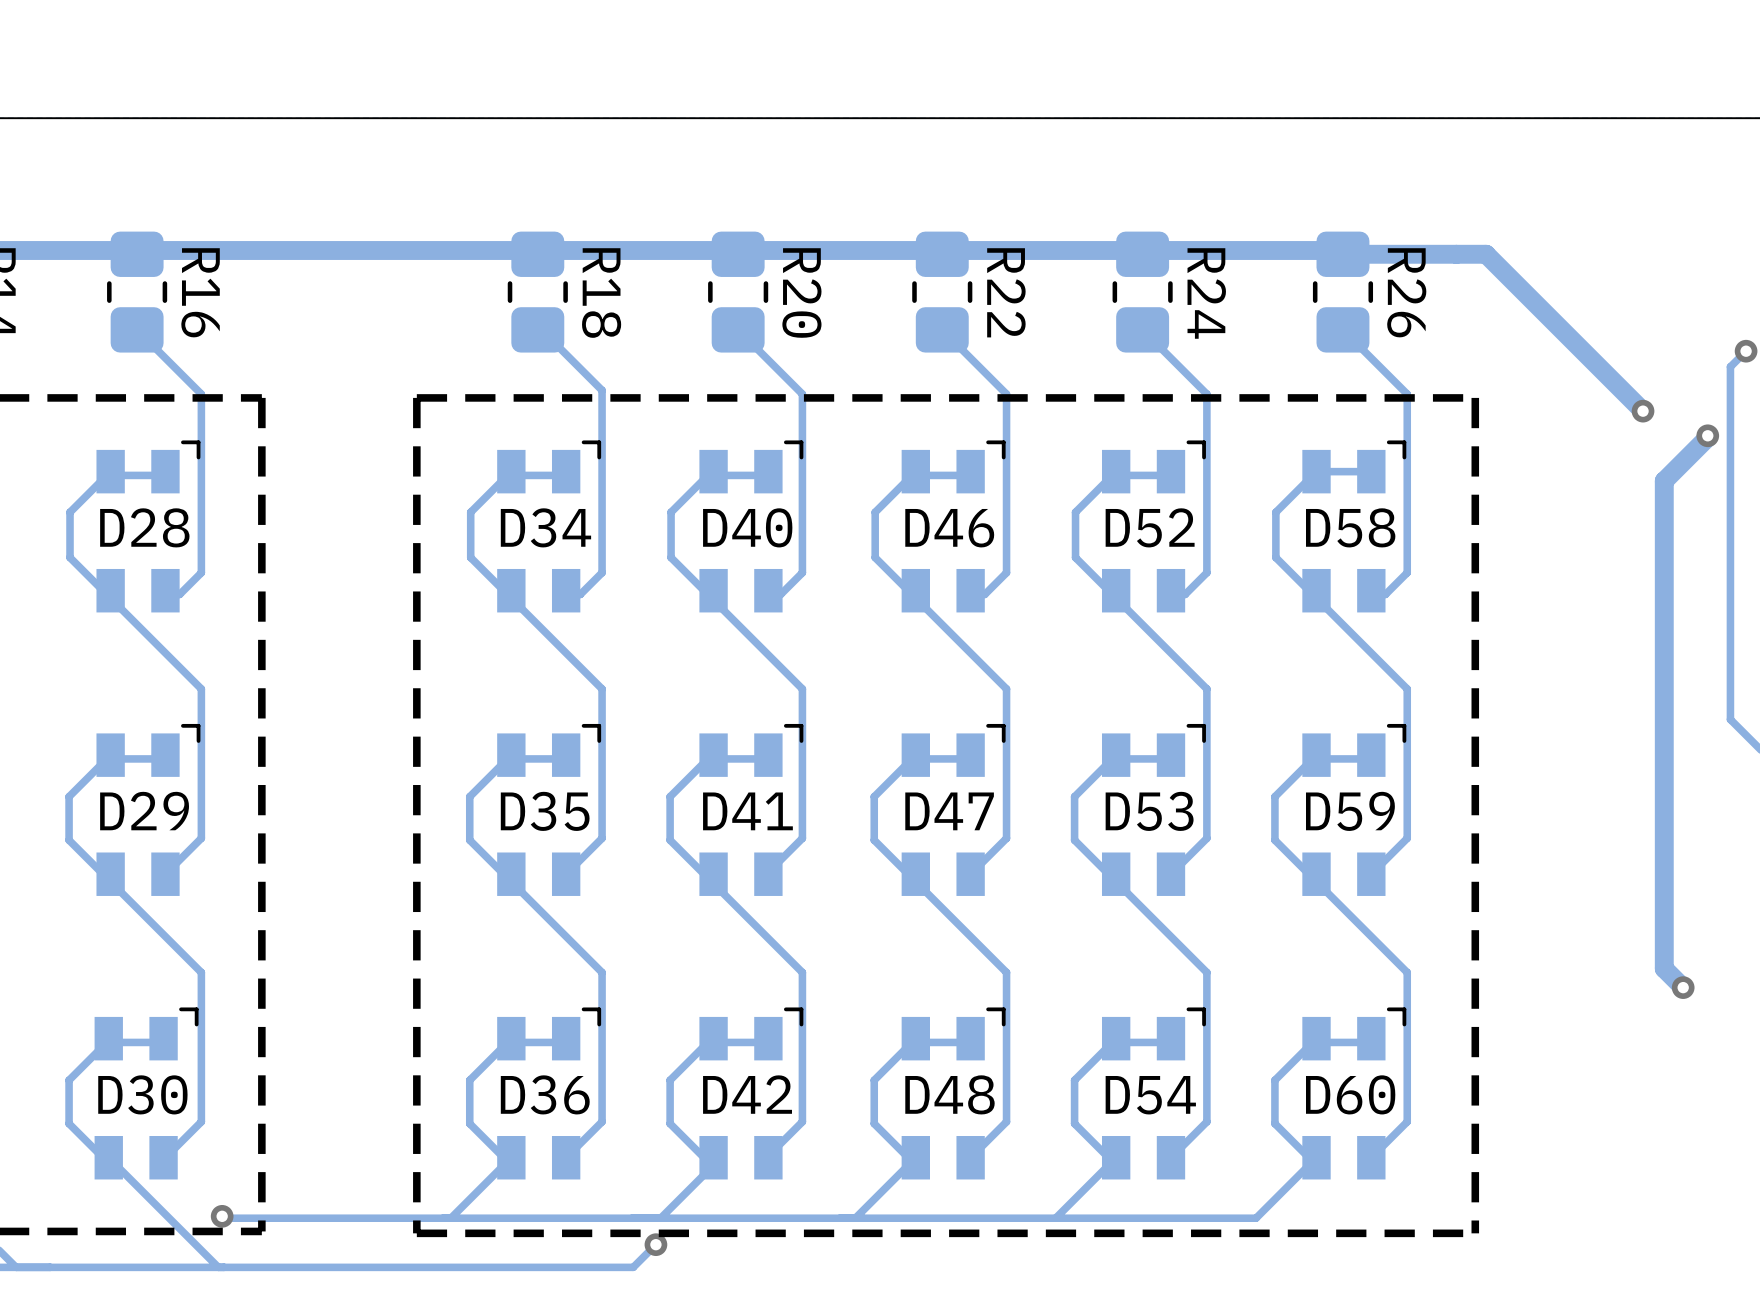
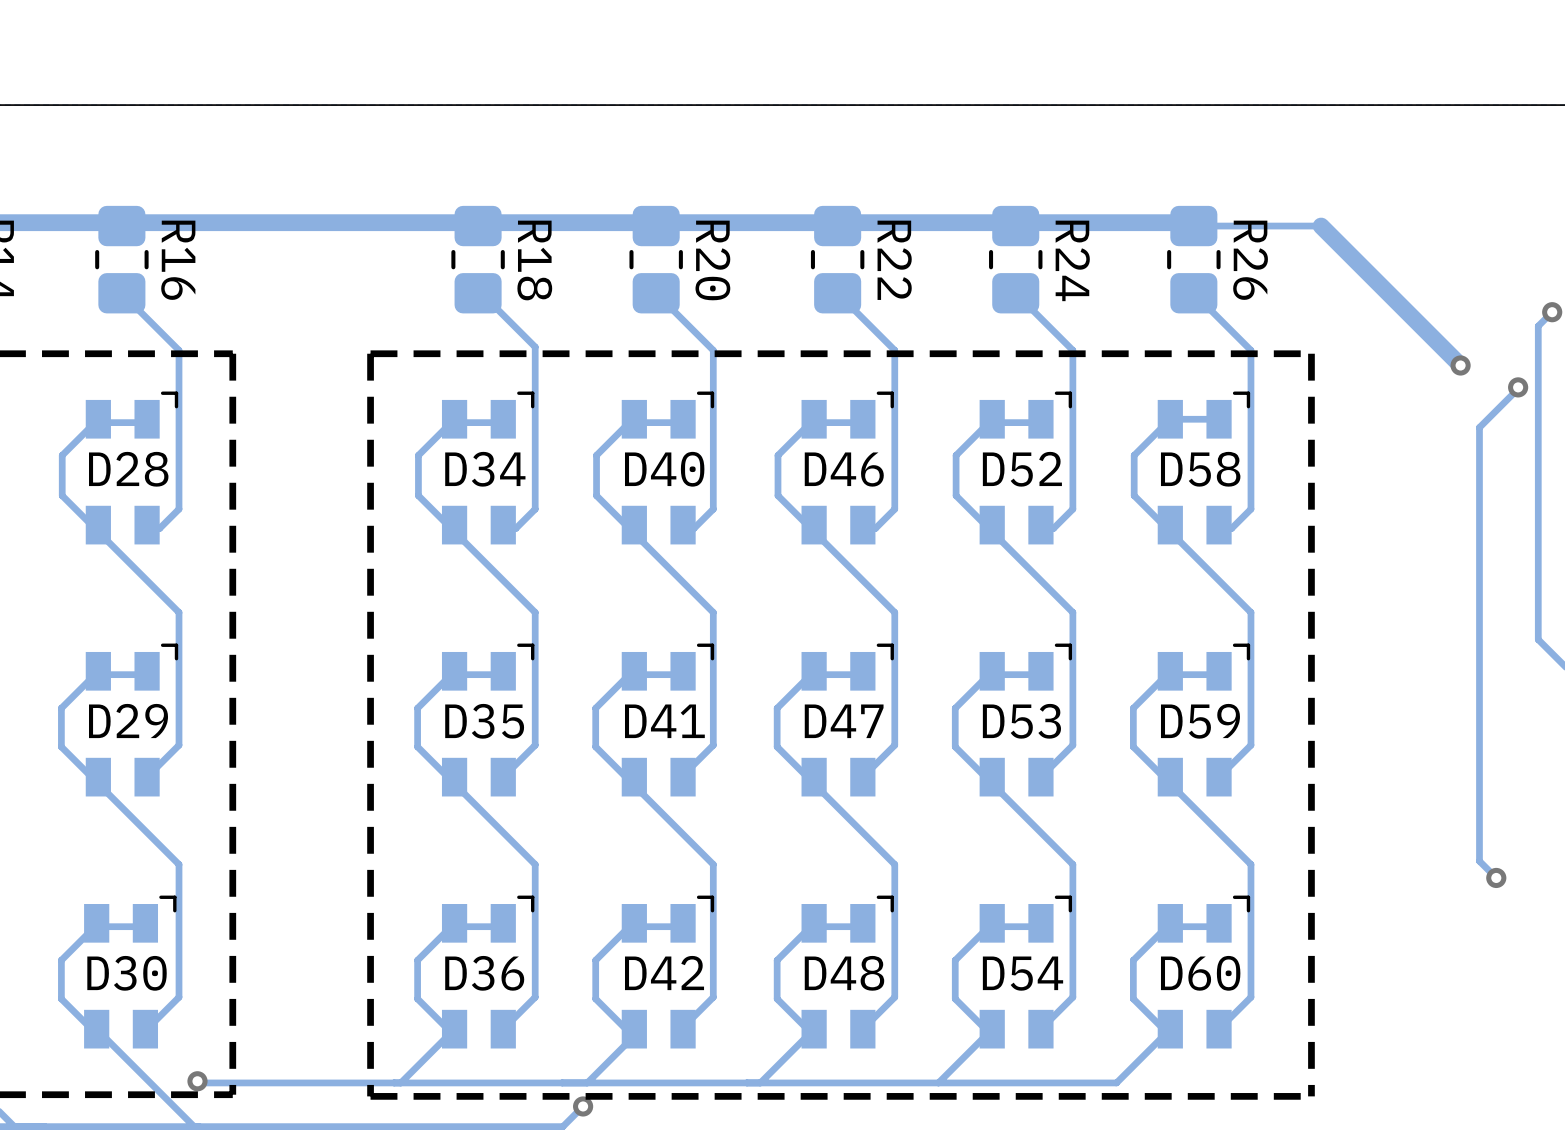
track width: thick (1486, 254) (1342, 254) -> thin (1321, 226) (1193, 226)
track width: thick (1707, 435) (1664, 480) (1664, 968) (1683, 987) -> thin (1518, 387) (1479, 427) (1479, 861) (1496, 877)

